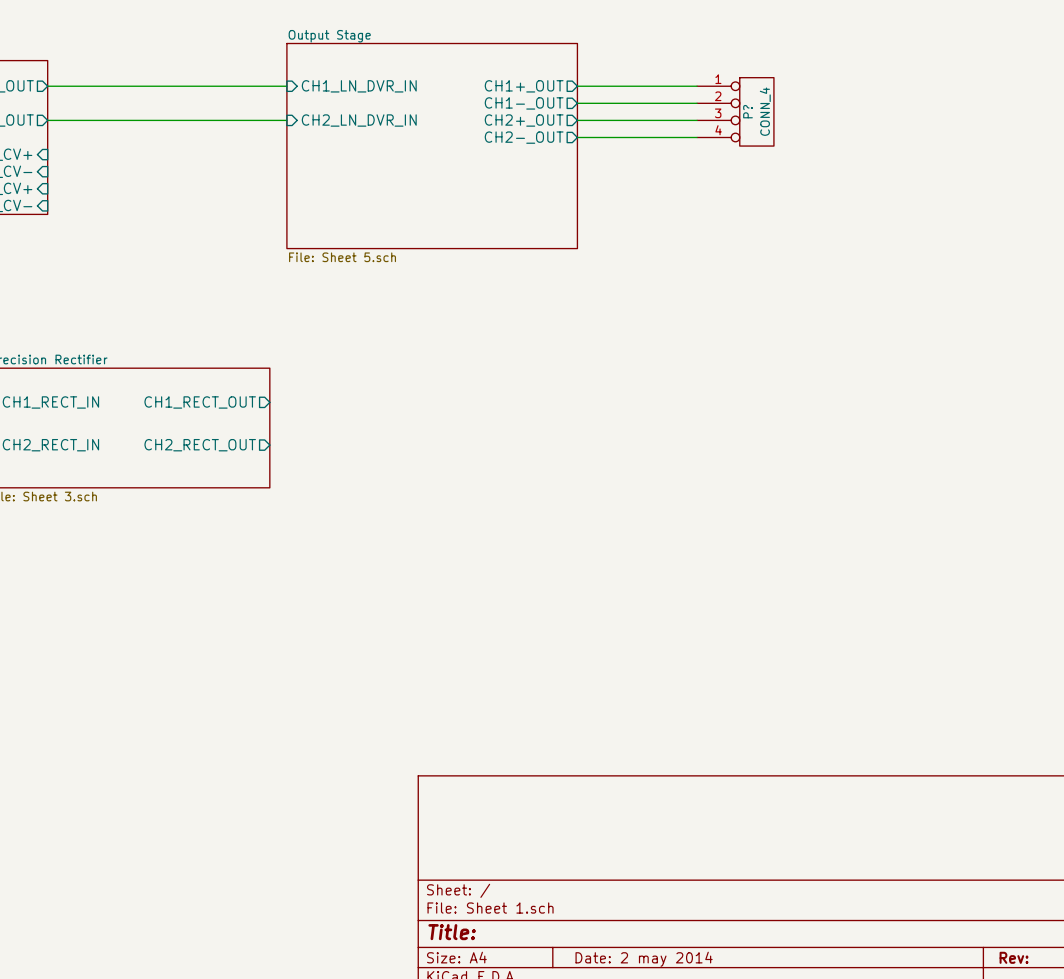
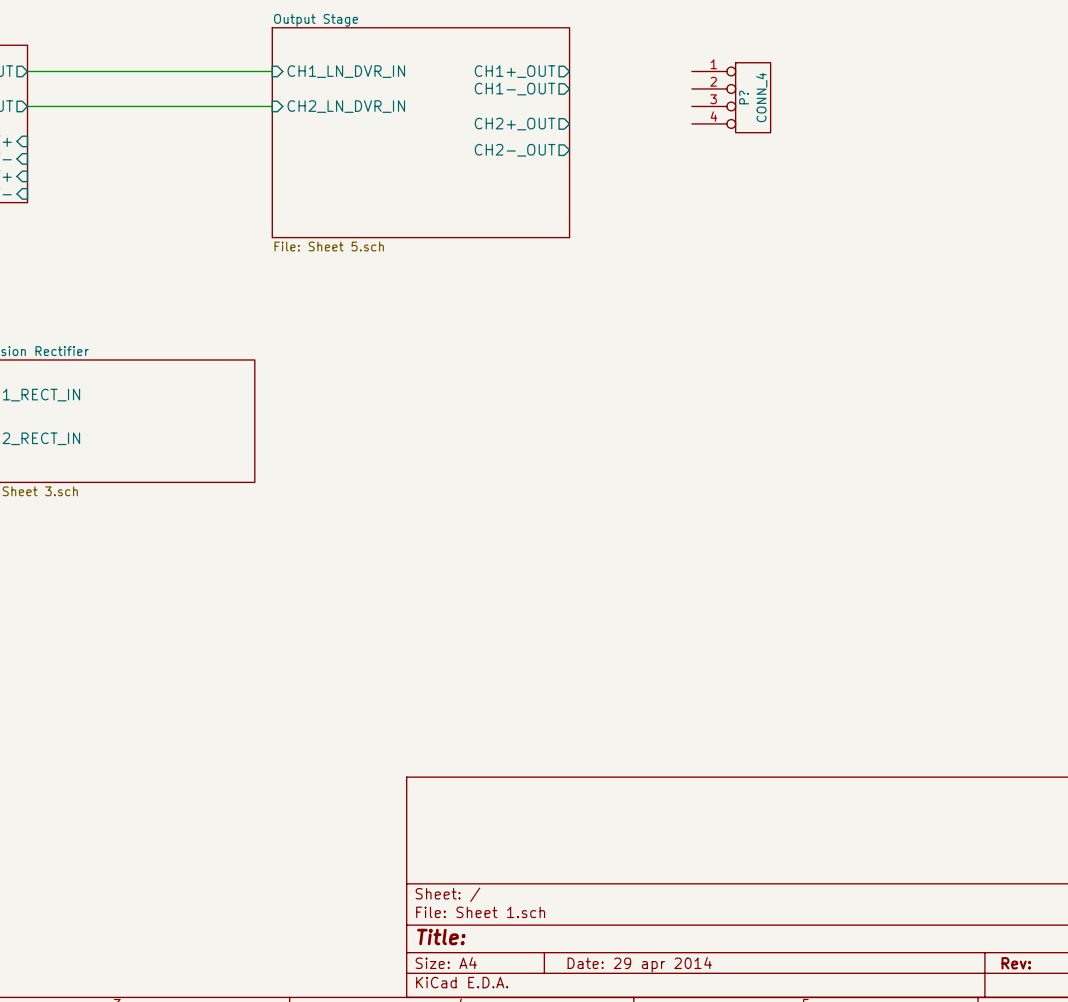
wire: (577, 86) (697, 86) -> none
wire: (577, 103) (697, 103) -> none
sheet pin: CH2+_OUT (524, 120) -> none
wire: (577, 120) (697, 120) -> none
sheet pin: CH2-_OUT (524, 137) -> CH2+_OUT (515, 124)
wire: (577, 137) (697, 137) -> none
sheet pin: none -> CH2-_OUT (515, 150)
sheet pin: CH1_RECT_OUT (200, 402) -> none
sheet pin: CH2_RECT_OUT (200, 445) -> none
title block: Date: 2 may 2014 (644, 959) -> Date: 29 apr 2014 (639, 964)

